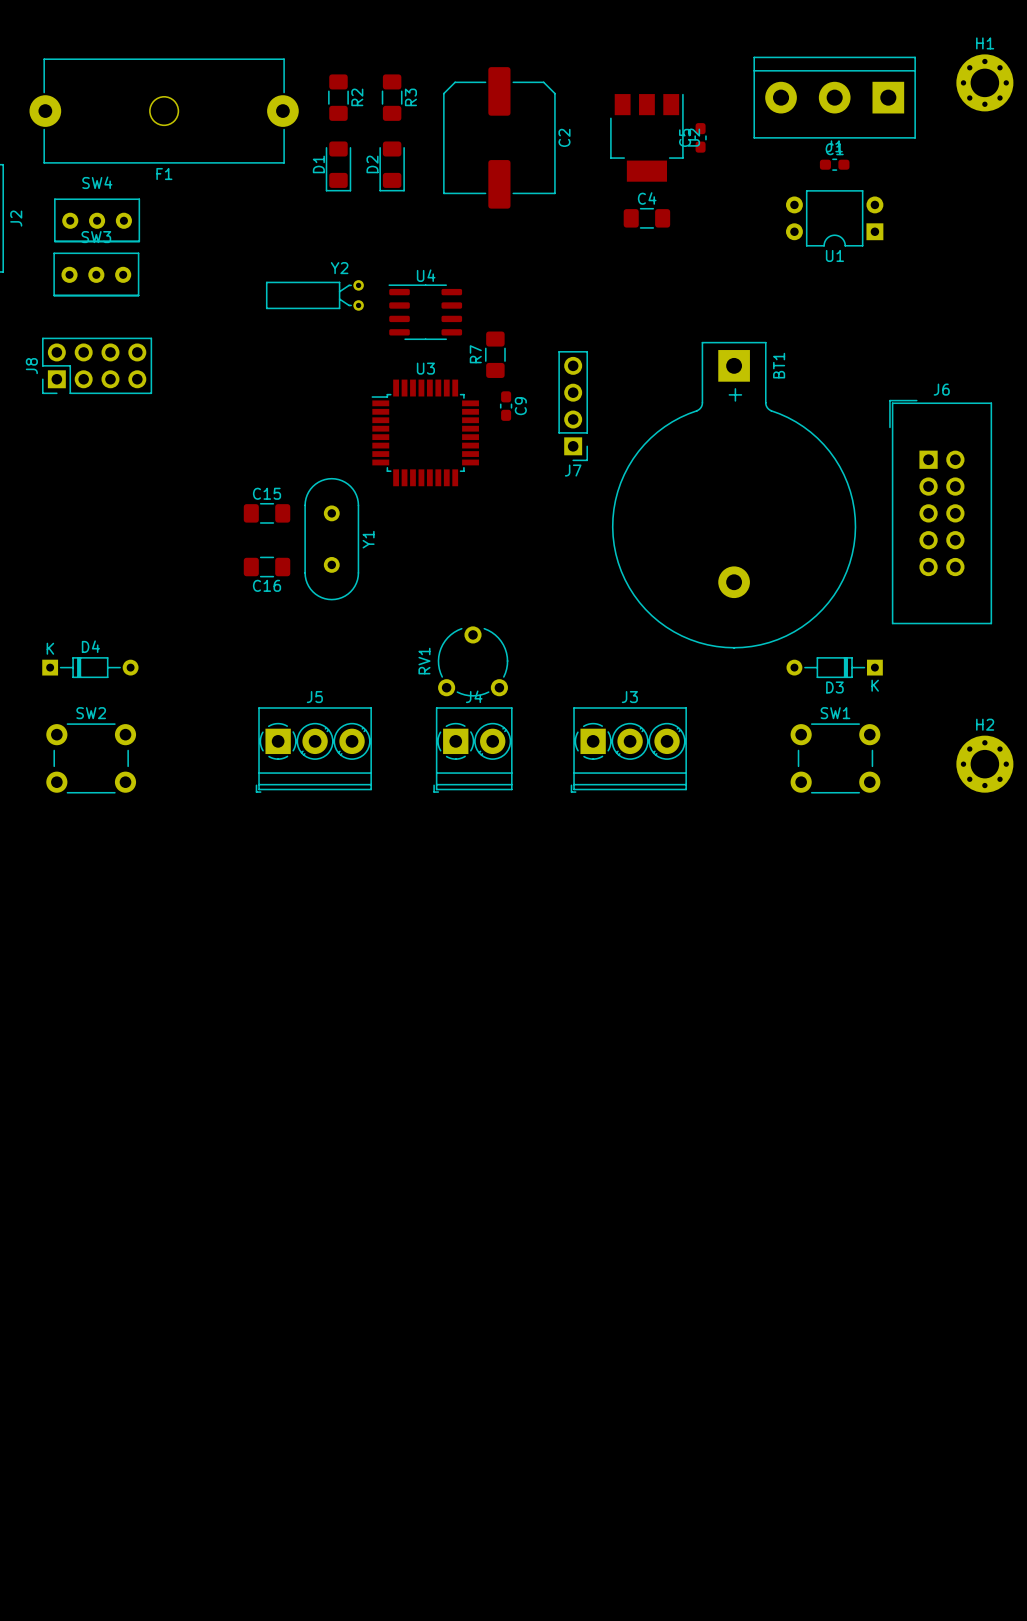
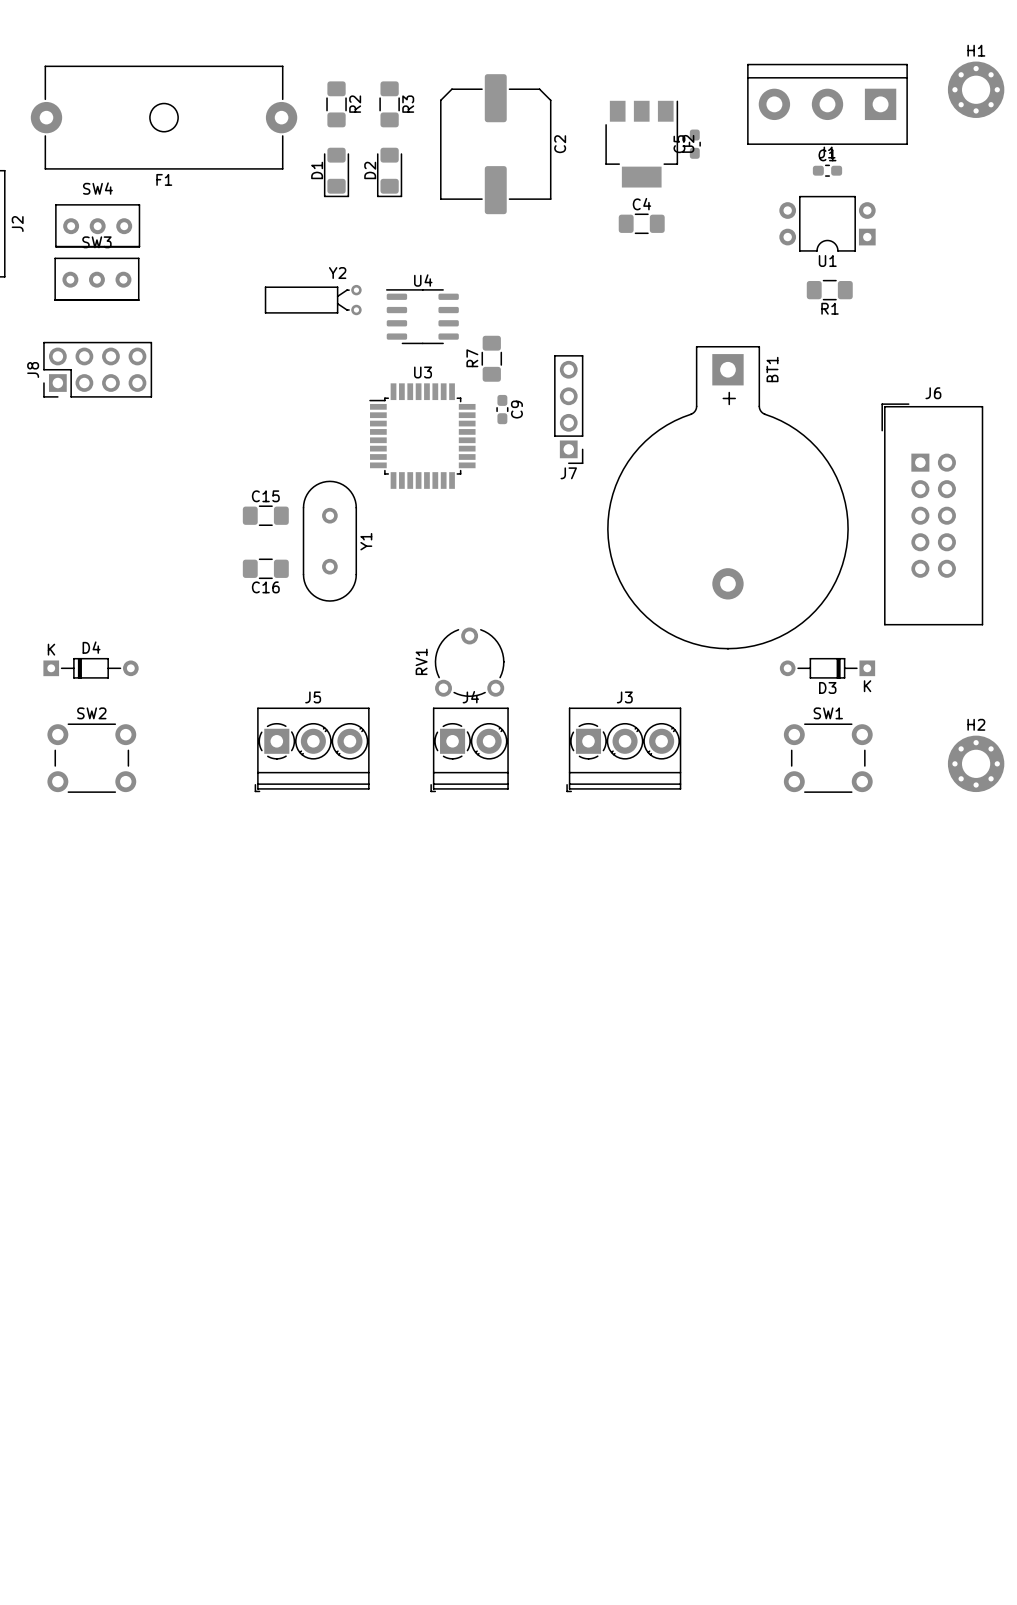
R1: none -> (829, 290)

